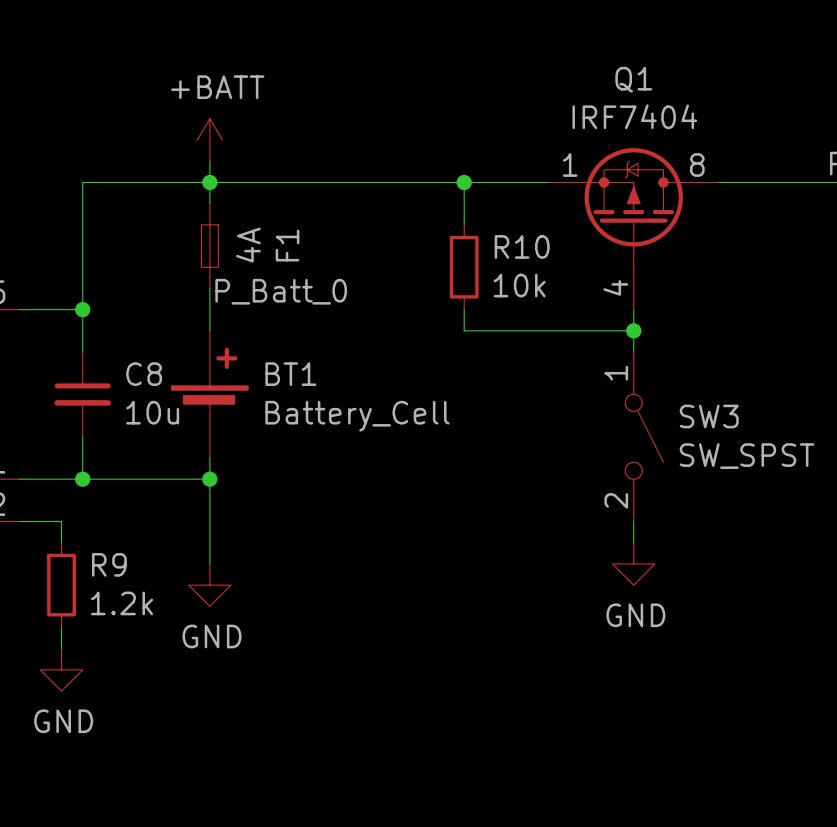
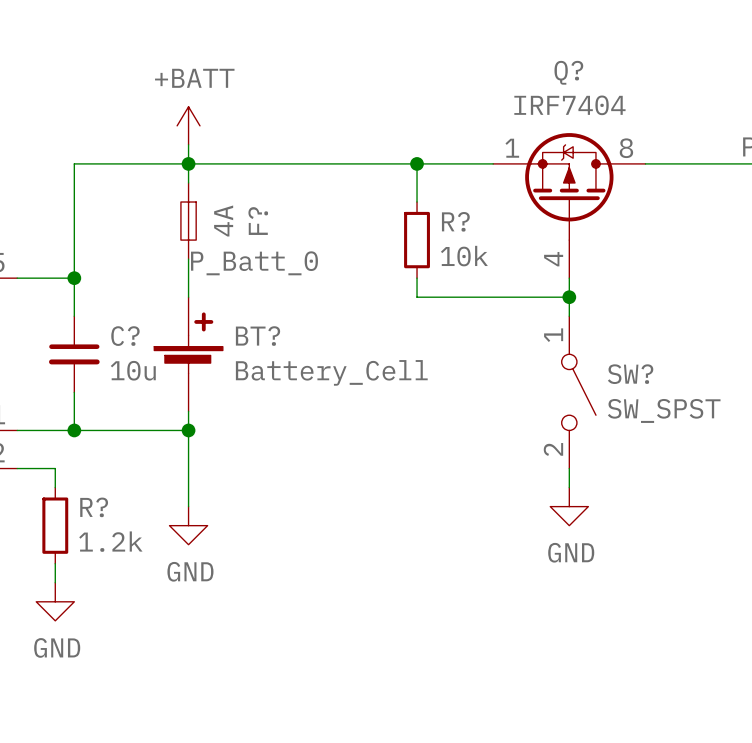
Q1 name: Q1 (633, 79) -> Q? (568, 72)
F1 name: F1 (287, 245) -> F? (258, 221)
R10 name: R10 (522, 246) -> R? (455, 221)
C8 name: C8 (144, 374) -> C? (125, 336)
BT1 name: BT1 (290, 374) -> BT? (258, 336)
SW3 name: SW3 (709, 416) -> SW? (630, 374)
R9 name: R9 (109, 564) -> R? (94, 507)

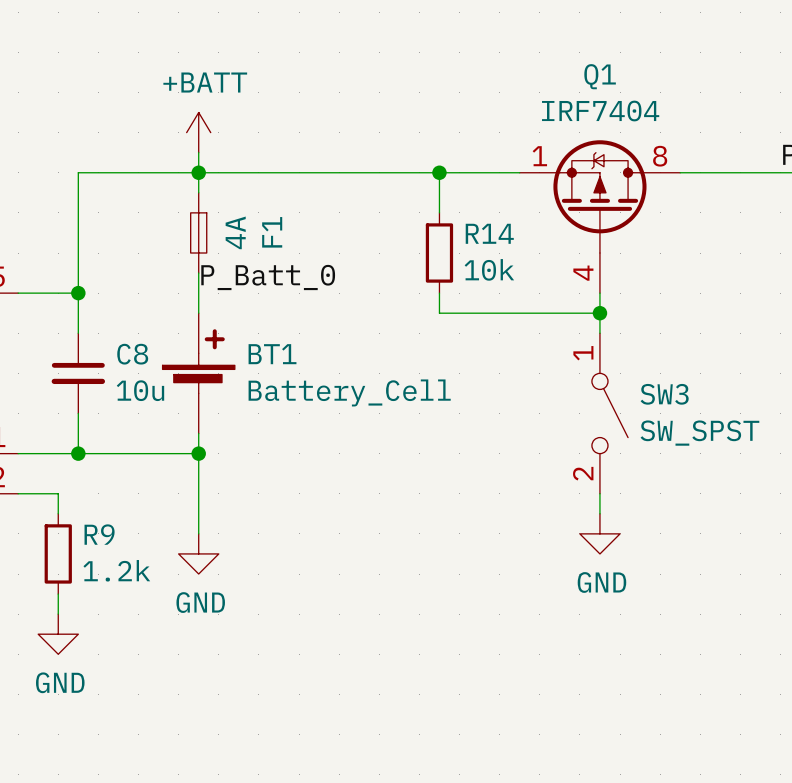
Q? name: Q? (568, 72) -> Q1 (600, 76)
F? name: F? (258, 221) -> F1 (272, 232)
R? name: R? (455, 221) -> R14 (489, 233)
C? name: C? (125, 336) -> C8 (132, 354)
BT? name: BT? (258, 336) -> BT1 (272, 354)
SW? name: SW? (630, 374) -> SW3 (664, 394)
R? name: R? (94, 507) -> R9 (99, 534)

